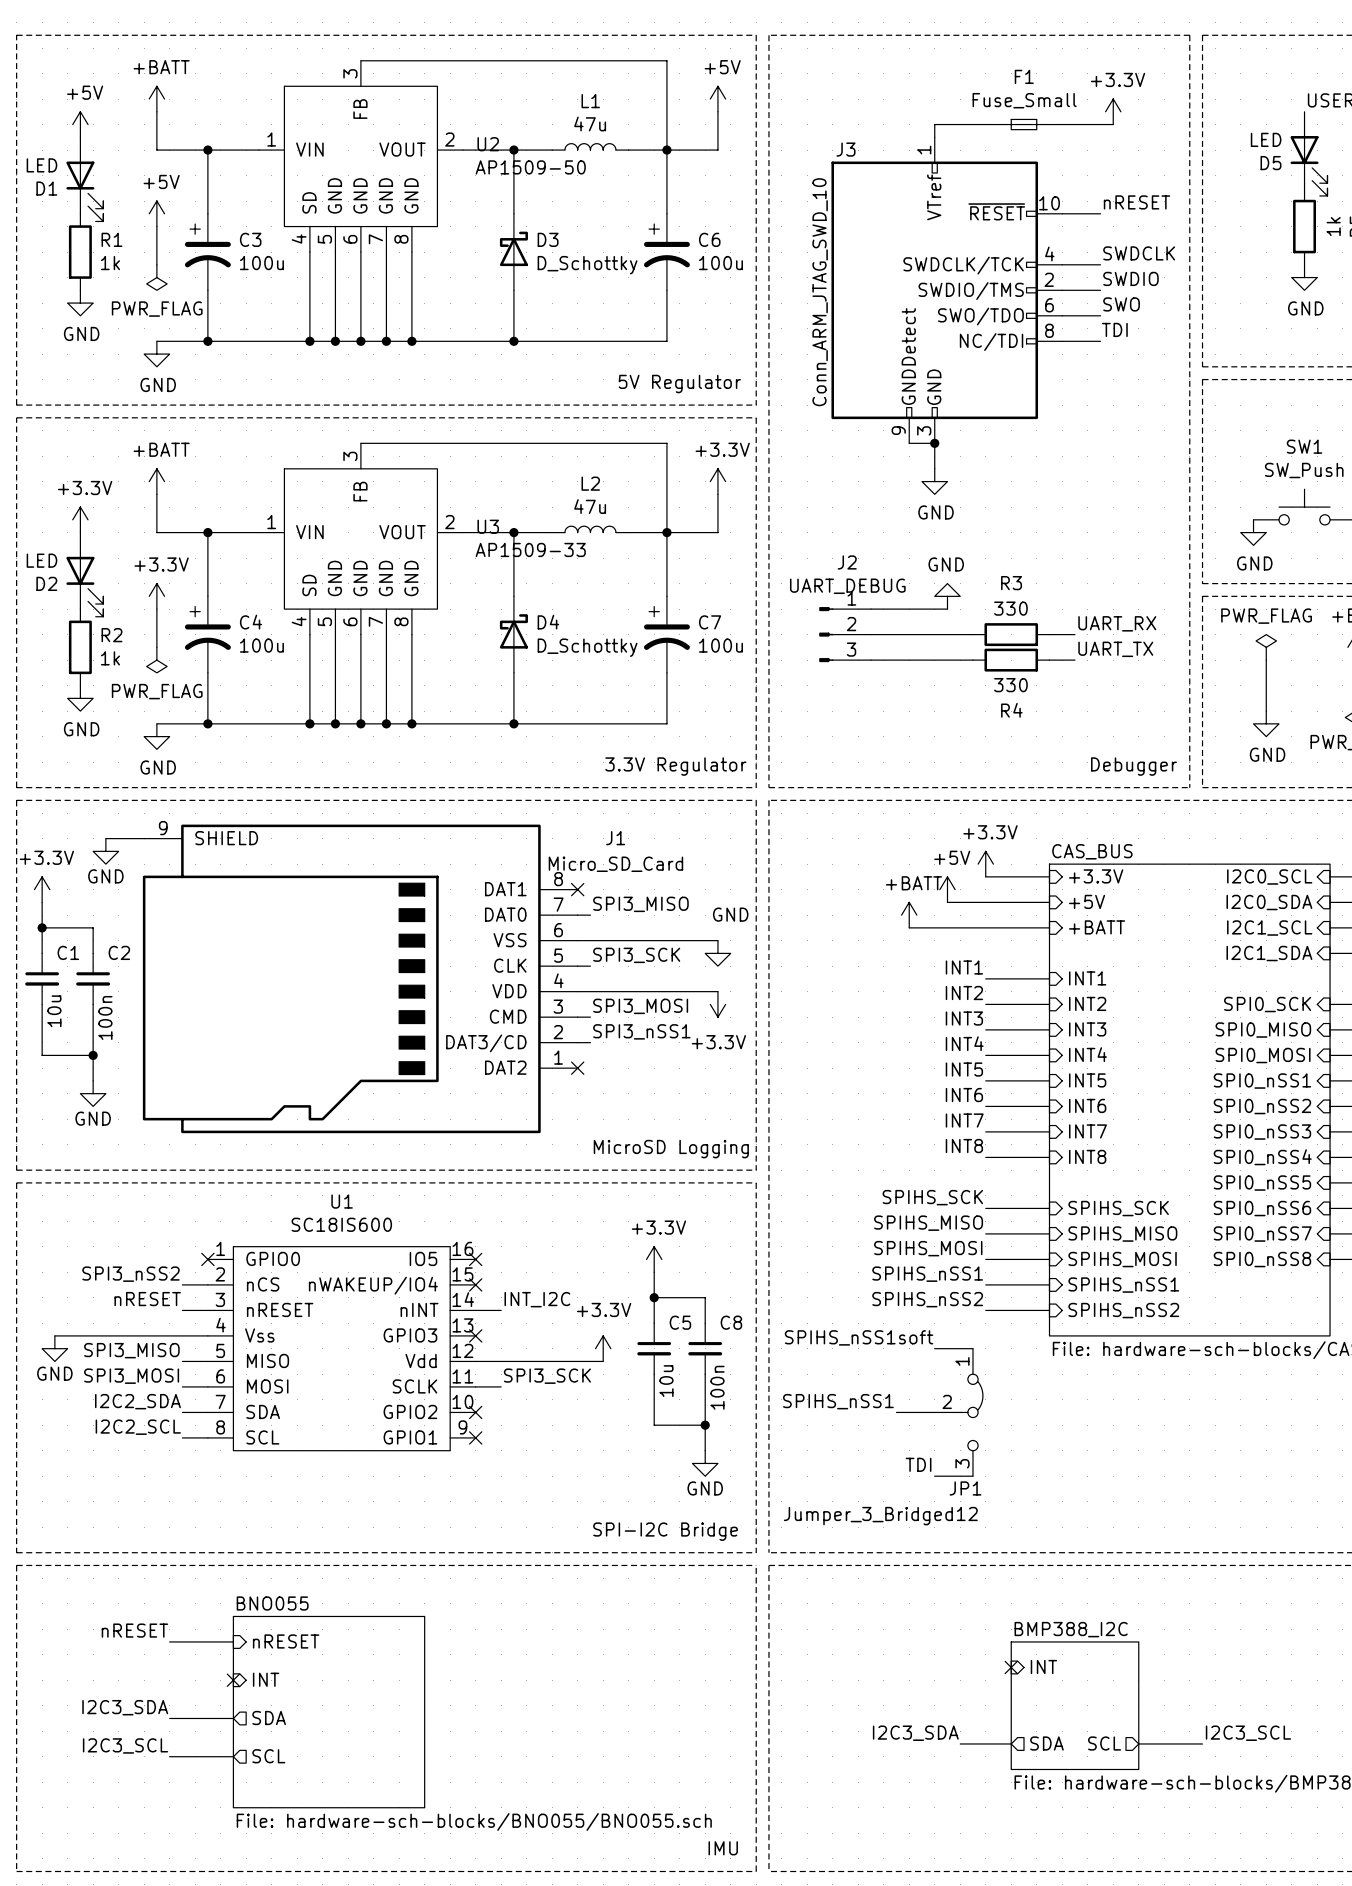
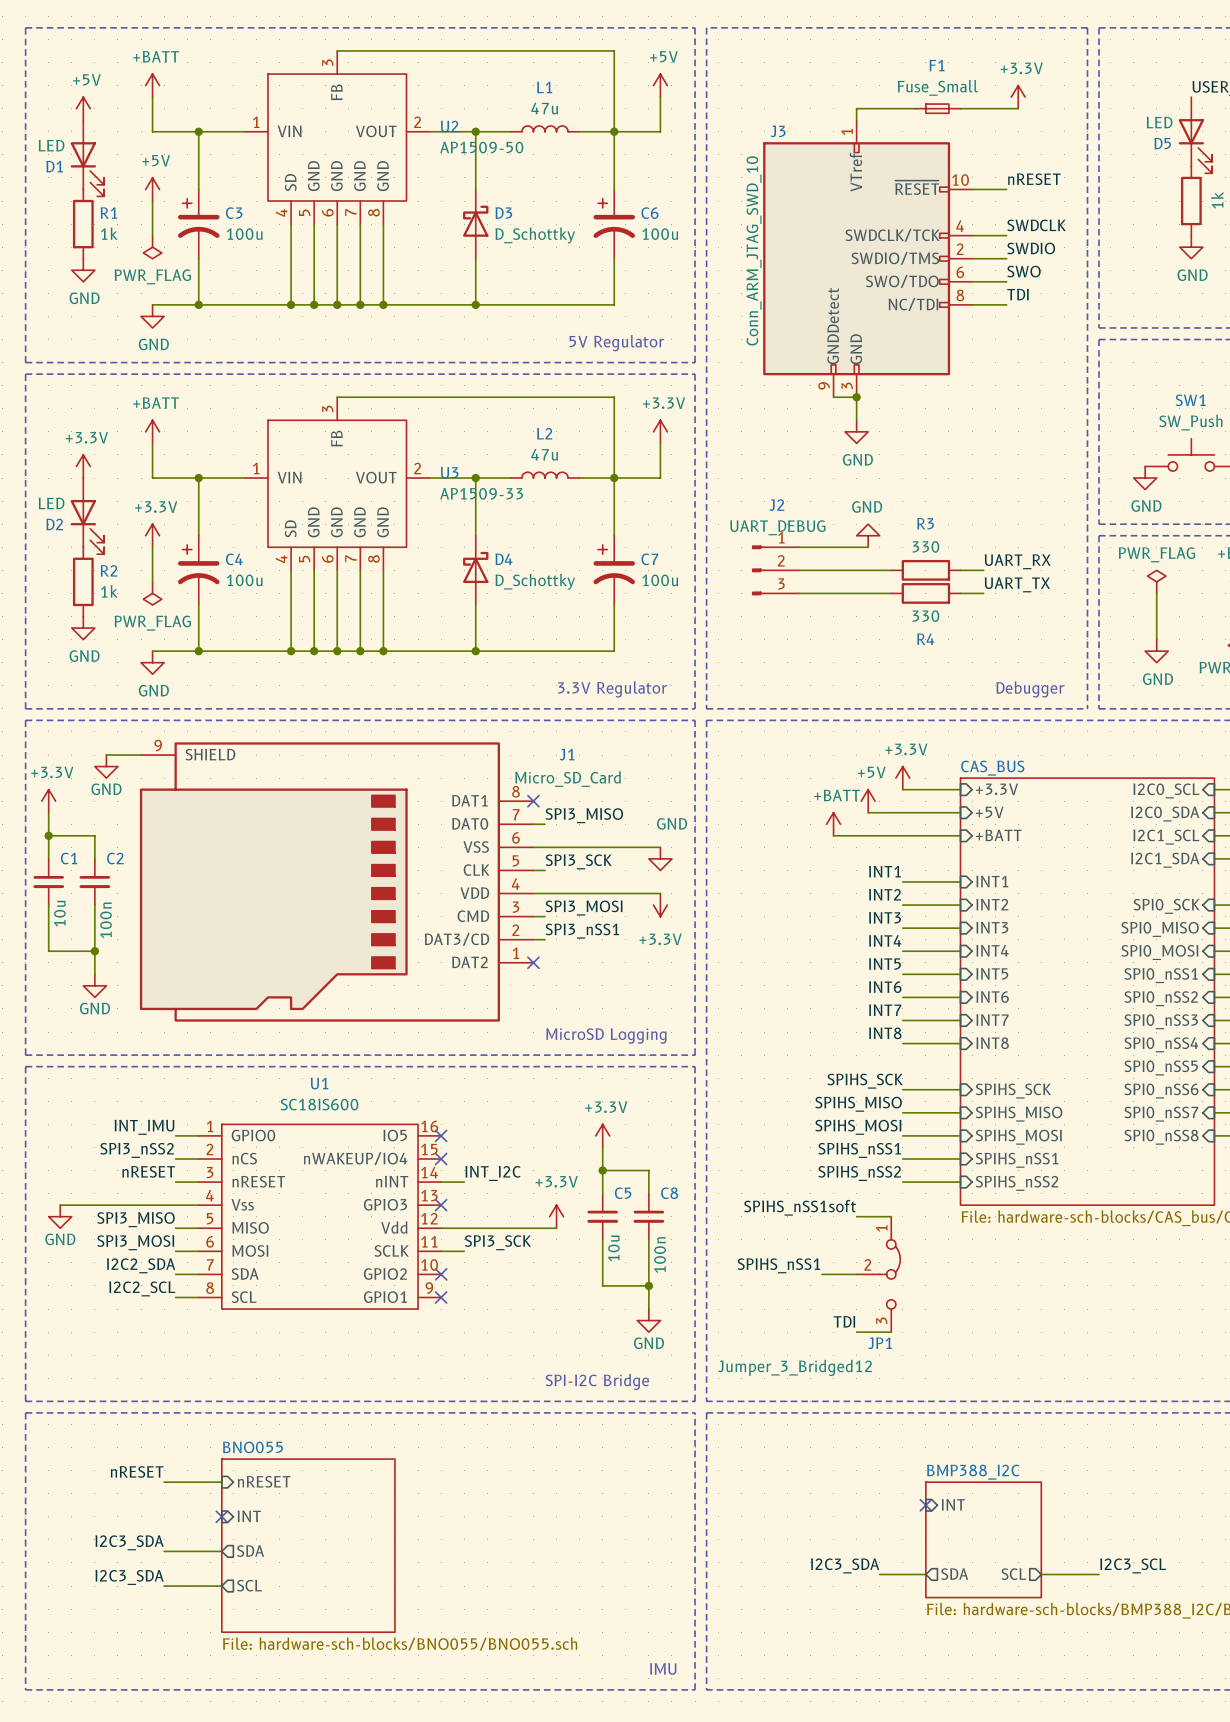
label: none -> INT_IMU (144, 1127)
wire: none -> (175, 1135) (198, 1135)
no-connect mark: (207, 1259) -> none
label: I2C3_SCL (125, 1745) -> I2C3_SDA (129, 1577)

